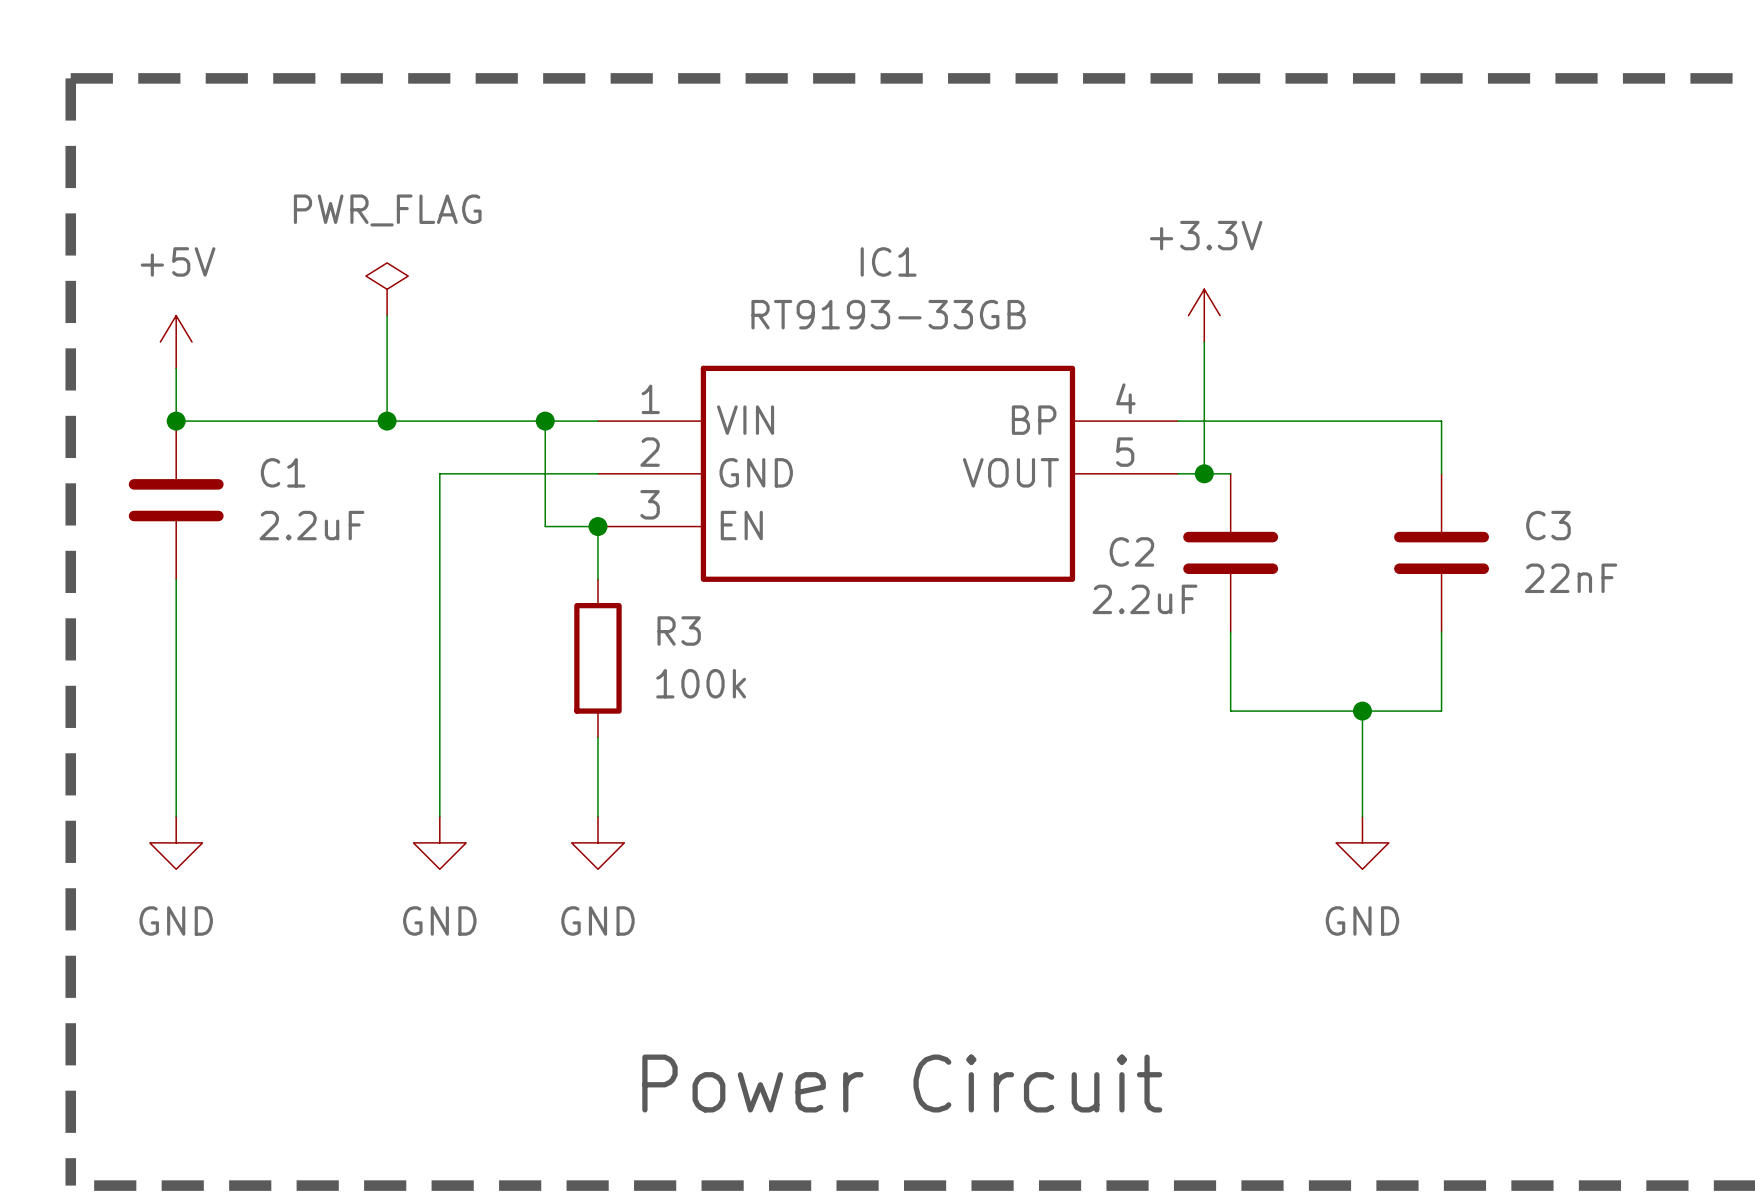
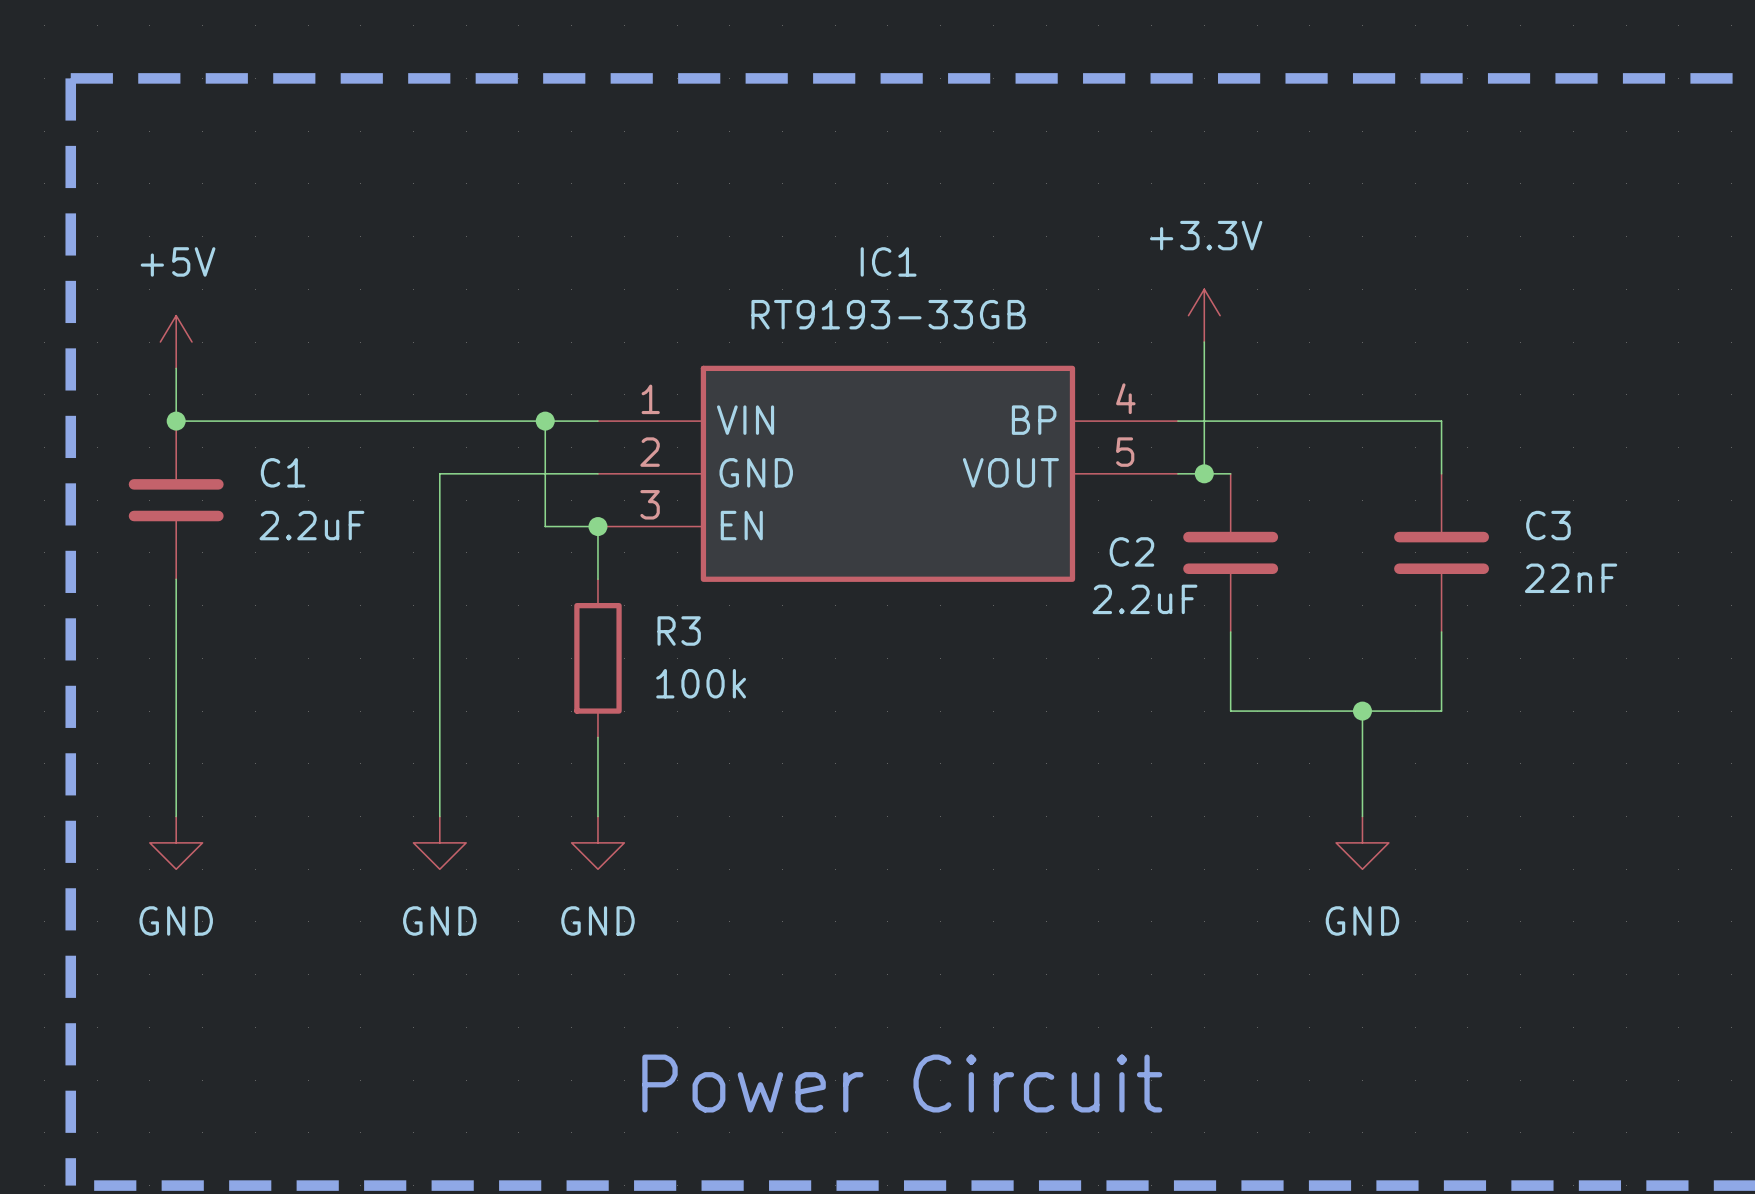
power symbol: PWR_FLAG (387, 289) -> none
wire: (387, 315) (387, 421) -> none
junction: (387, 421) -> none

